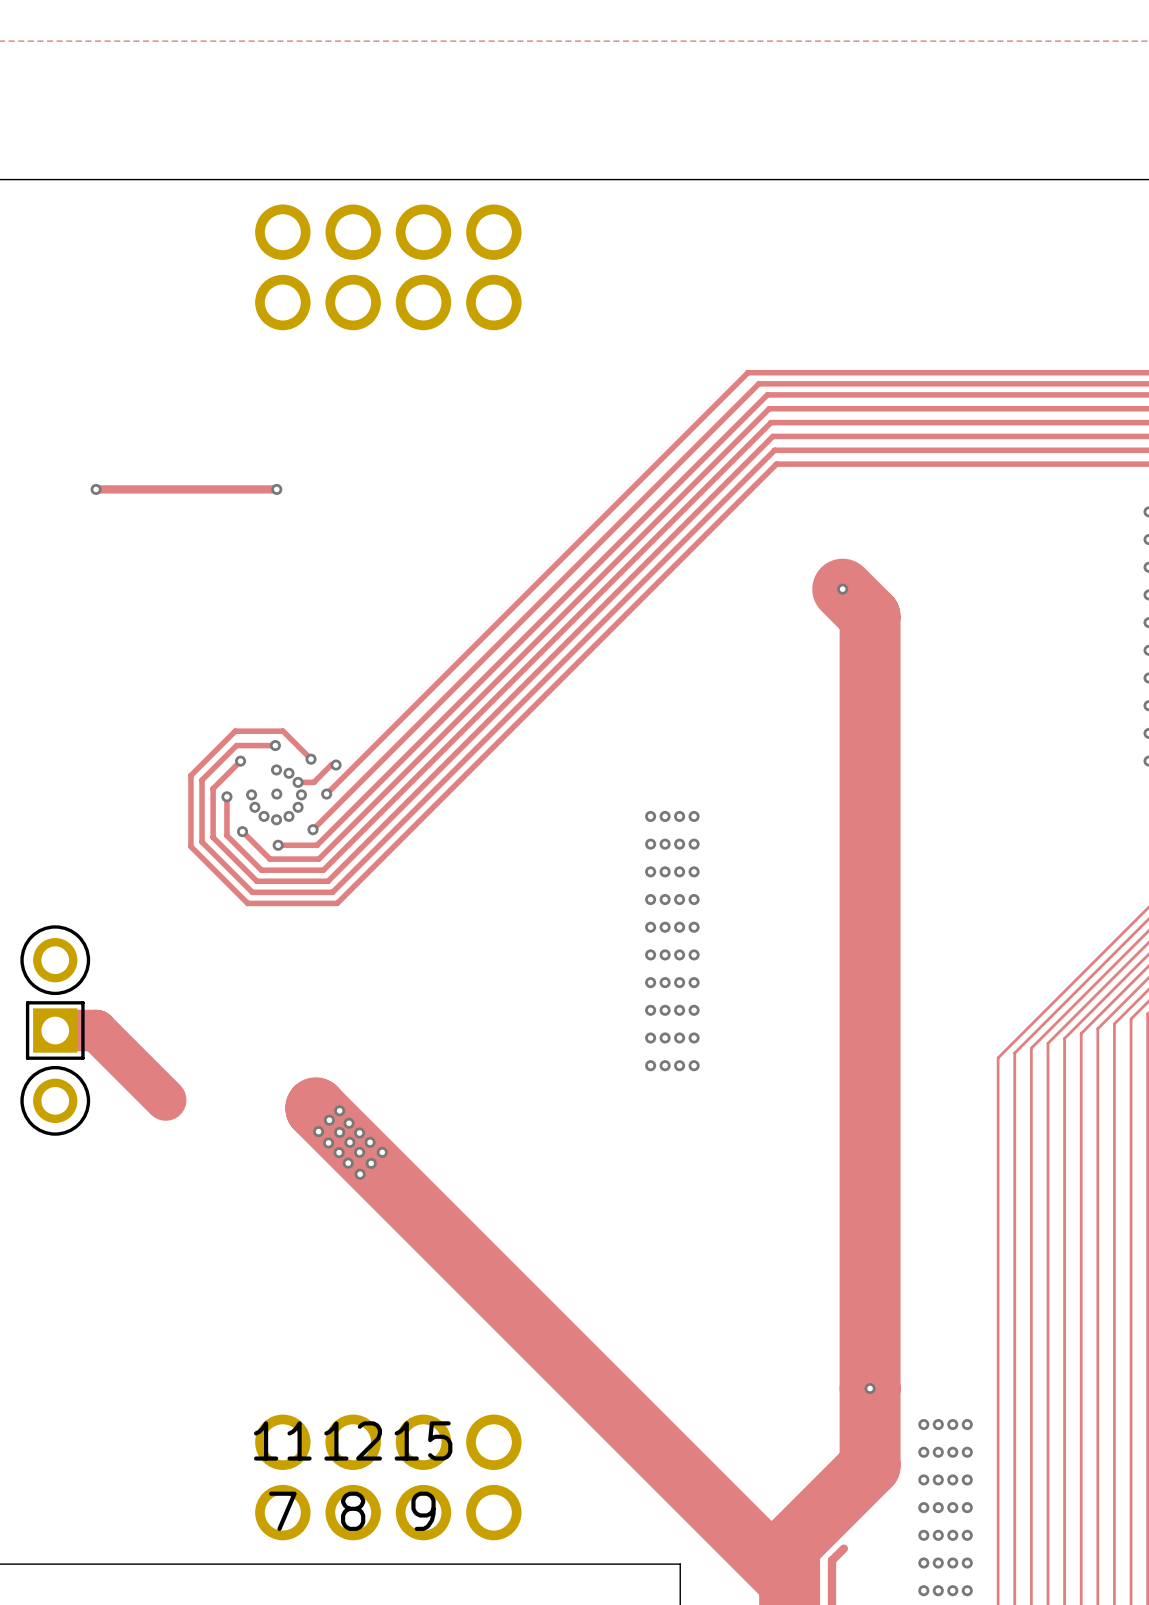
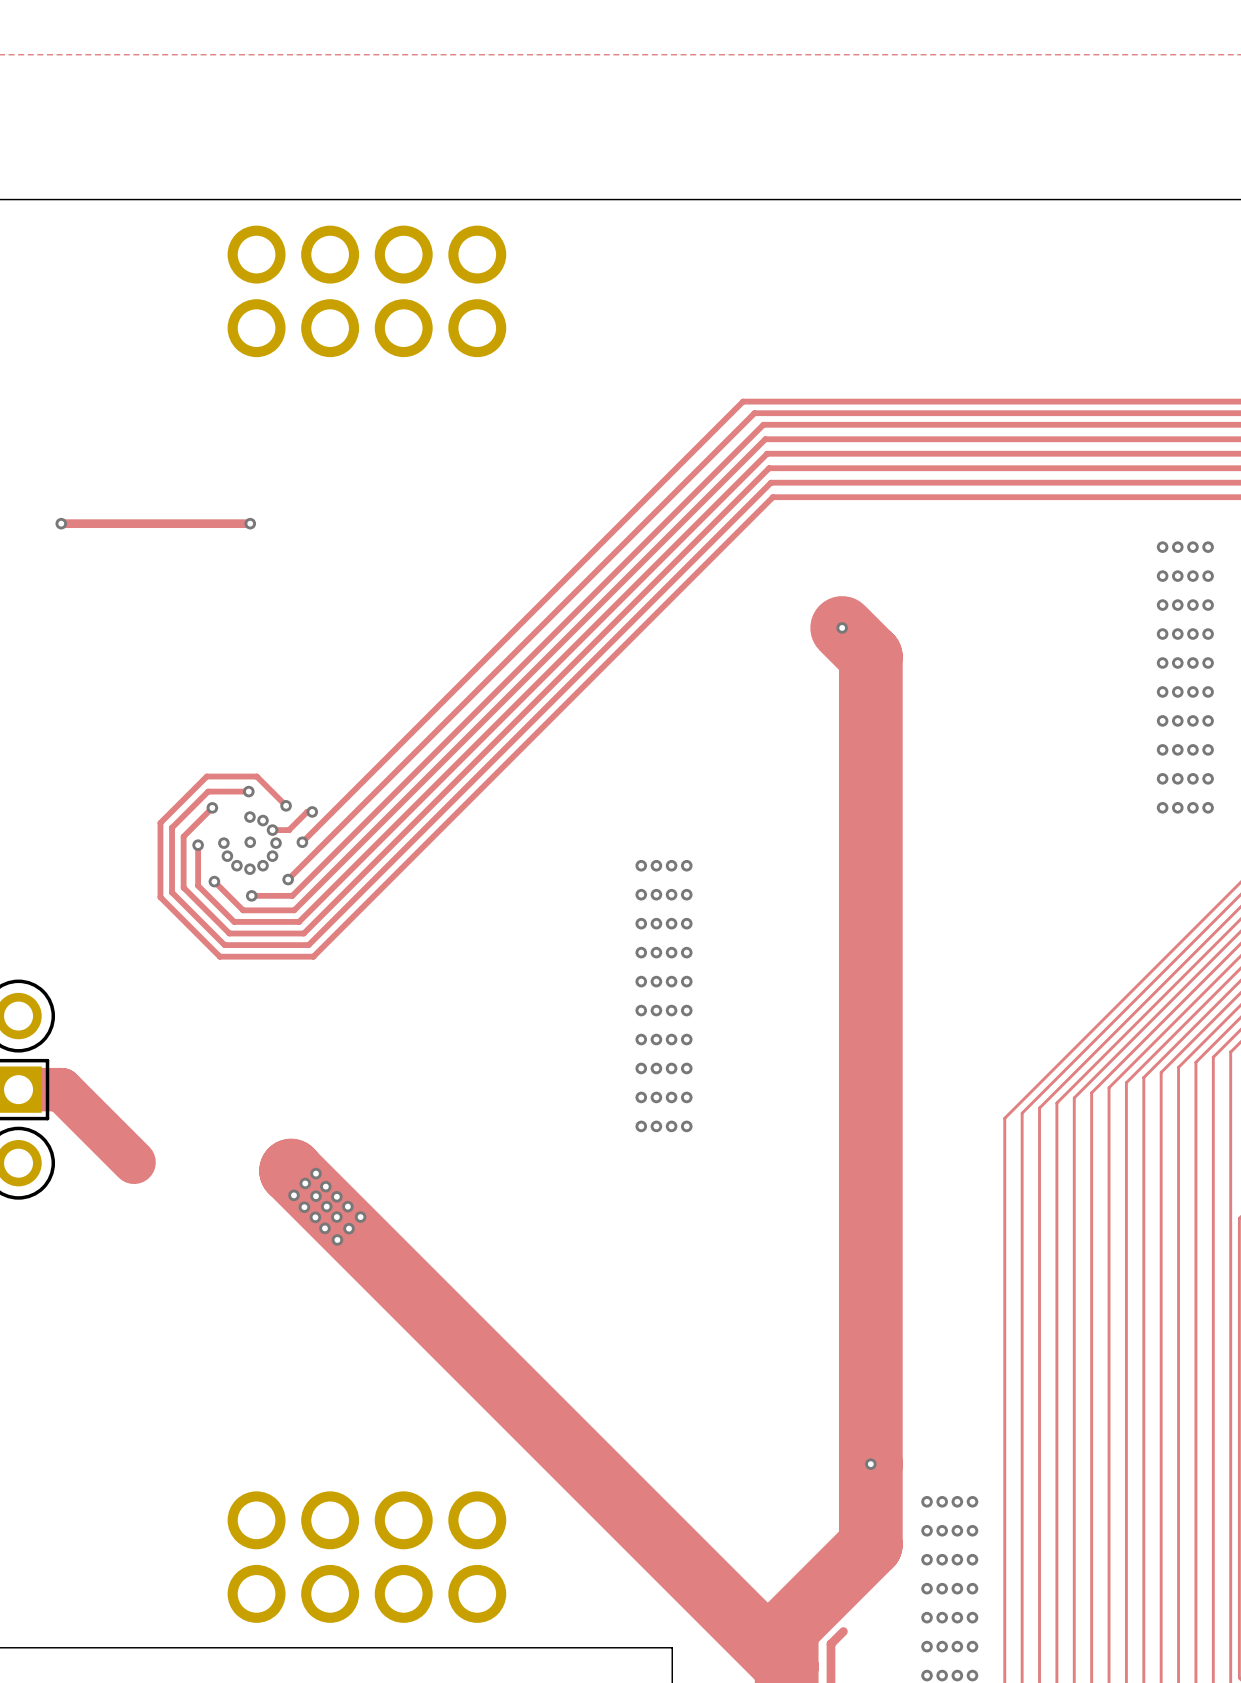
11 name: 11 (282, 1440) -> none
12 name: 12 (353, 1440) -> none
15 name: 15 (423, 1440) -> none
7 name: 7 (282, 1511) -> none
8 name: 8 (353, 1511) -> none
9 name: 9 (423, 1511) -> none

